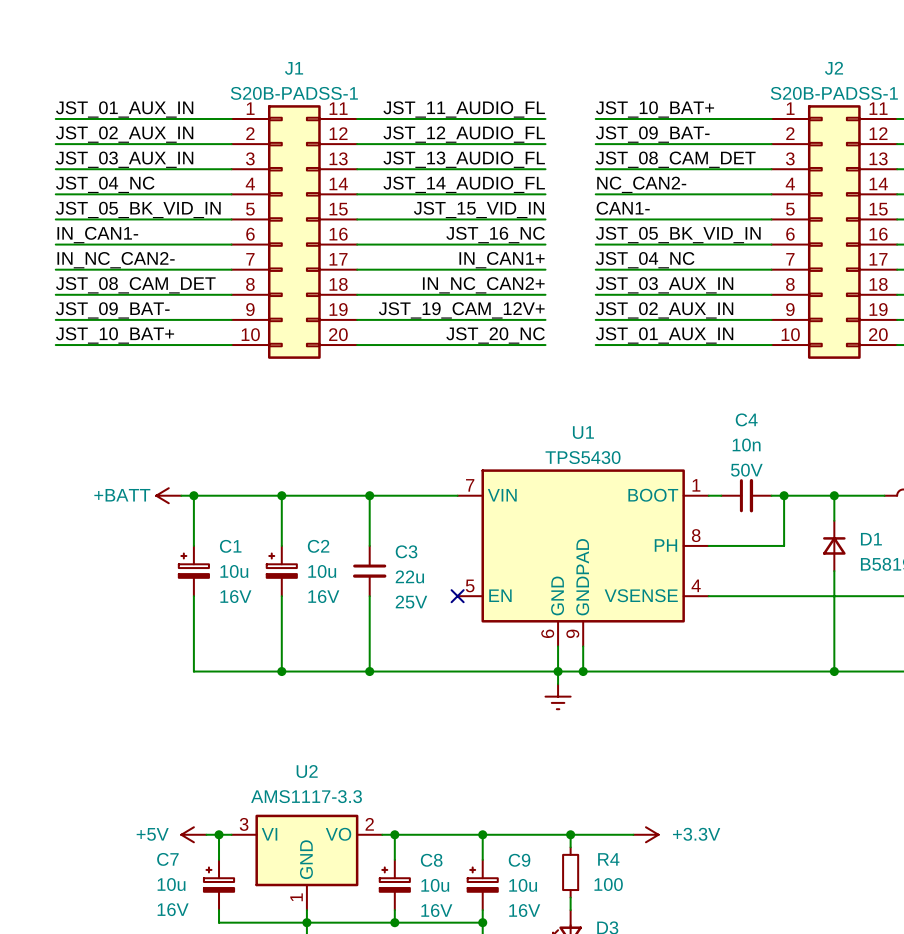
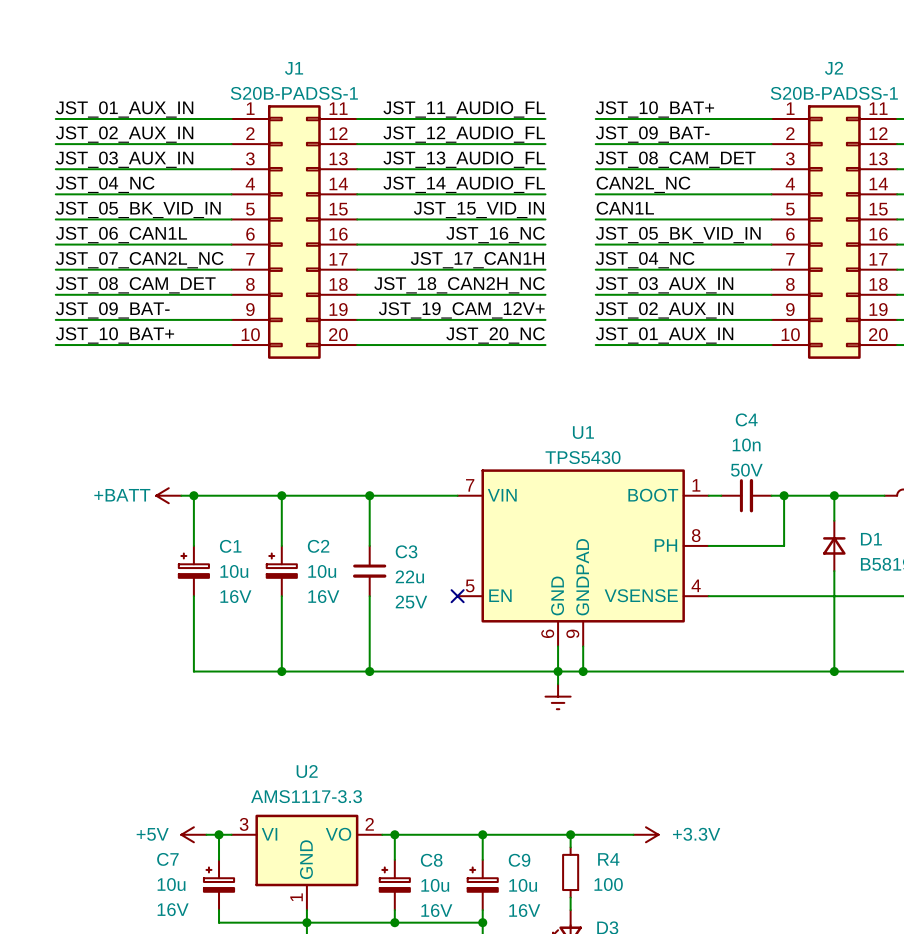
label: NC_CAN2- (641, 184) -> CAN2L_NC (643, 184)
label: CAN1- (623, 208) -> CAN1L (625, 208)
label: IN_CAN1- (97, 235) -> JST_06_CAN1L (121, 235)
label: IN_NC_CAN2- (116, 260) -> JST_07_CAN2L_NC (139, 260)
label: IN_CAN1+ (502, 260) -> JST_17_CAN1H (477, 260)
label: IN_NC_CAN2+ (483, 285) -> JST_18_CAN2H_NC (459, 285)

